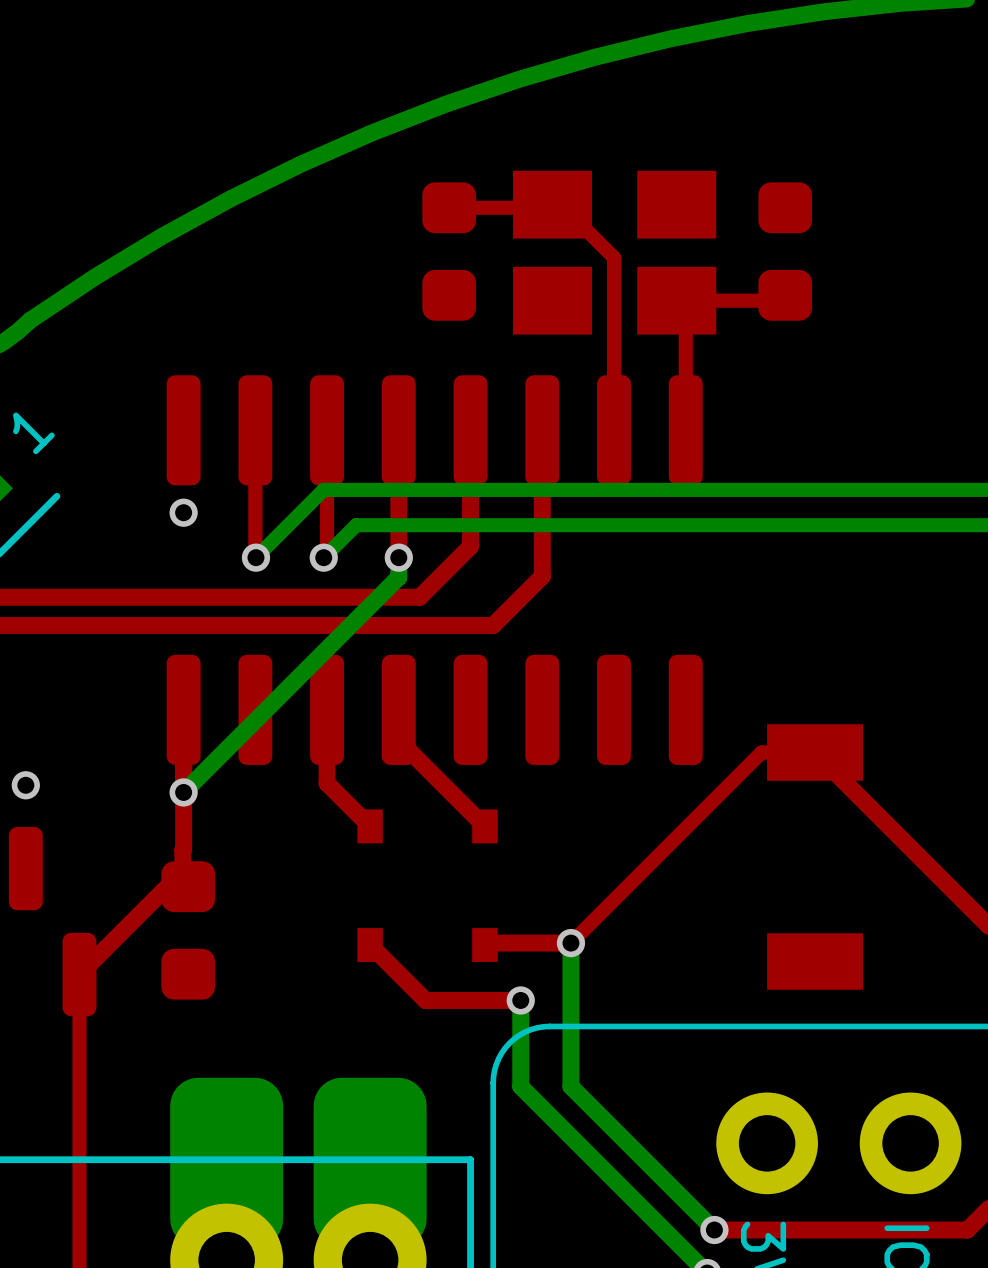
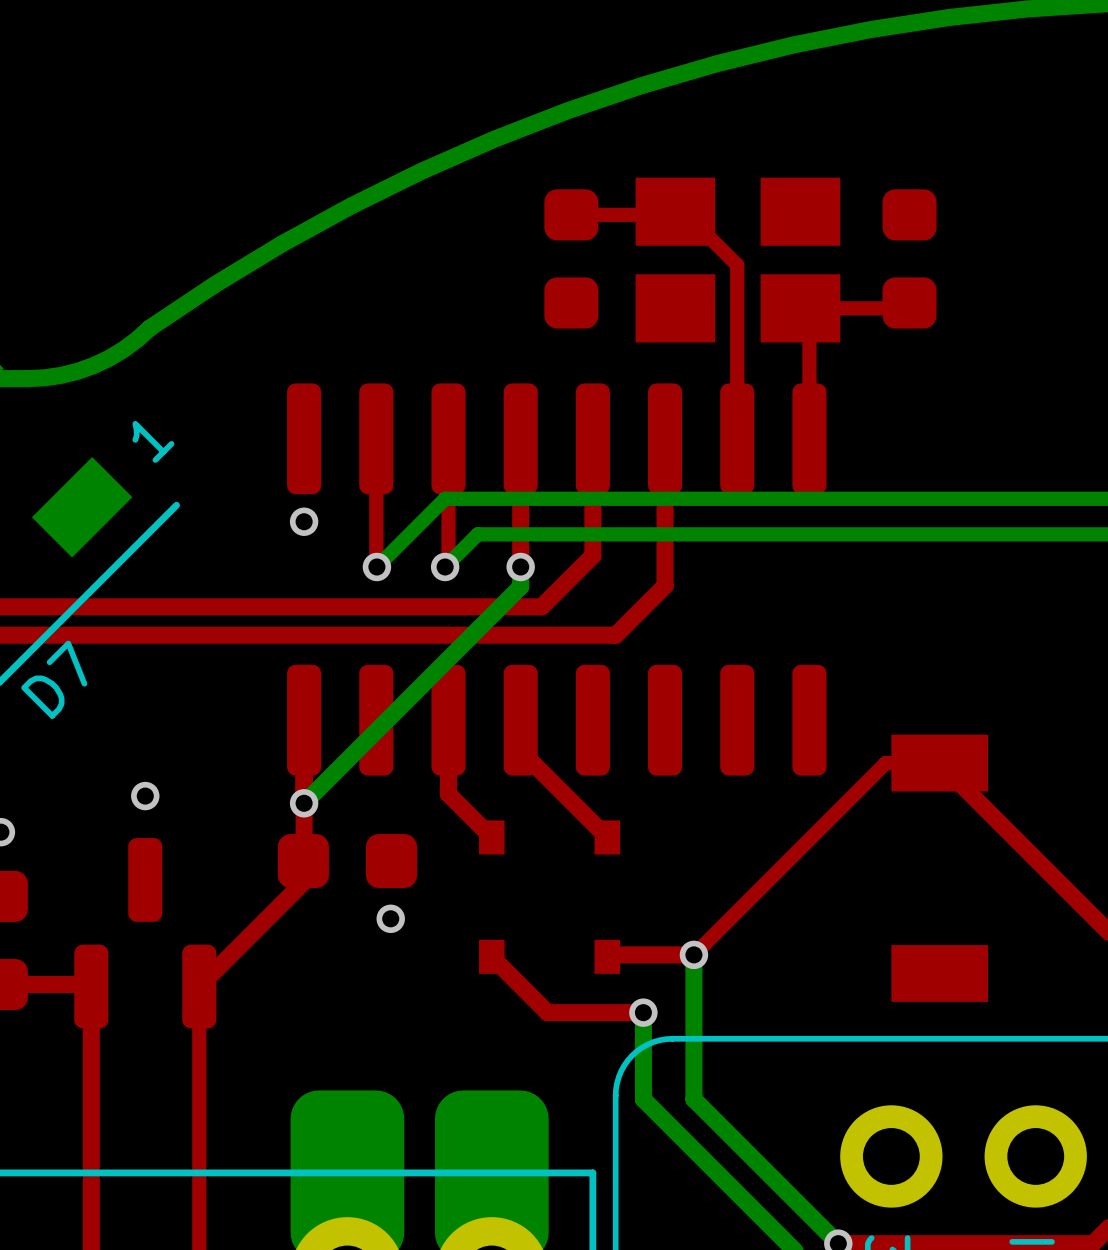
via: none -> (390, 918)
part rotation: 0° (188, 930) -> 90° clockwise (347, 861)
part position: (188, 930) -> (347, 861)

